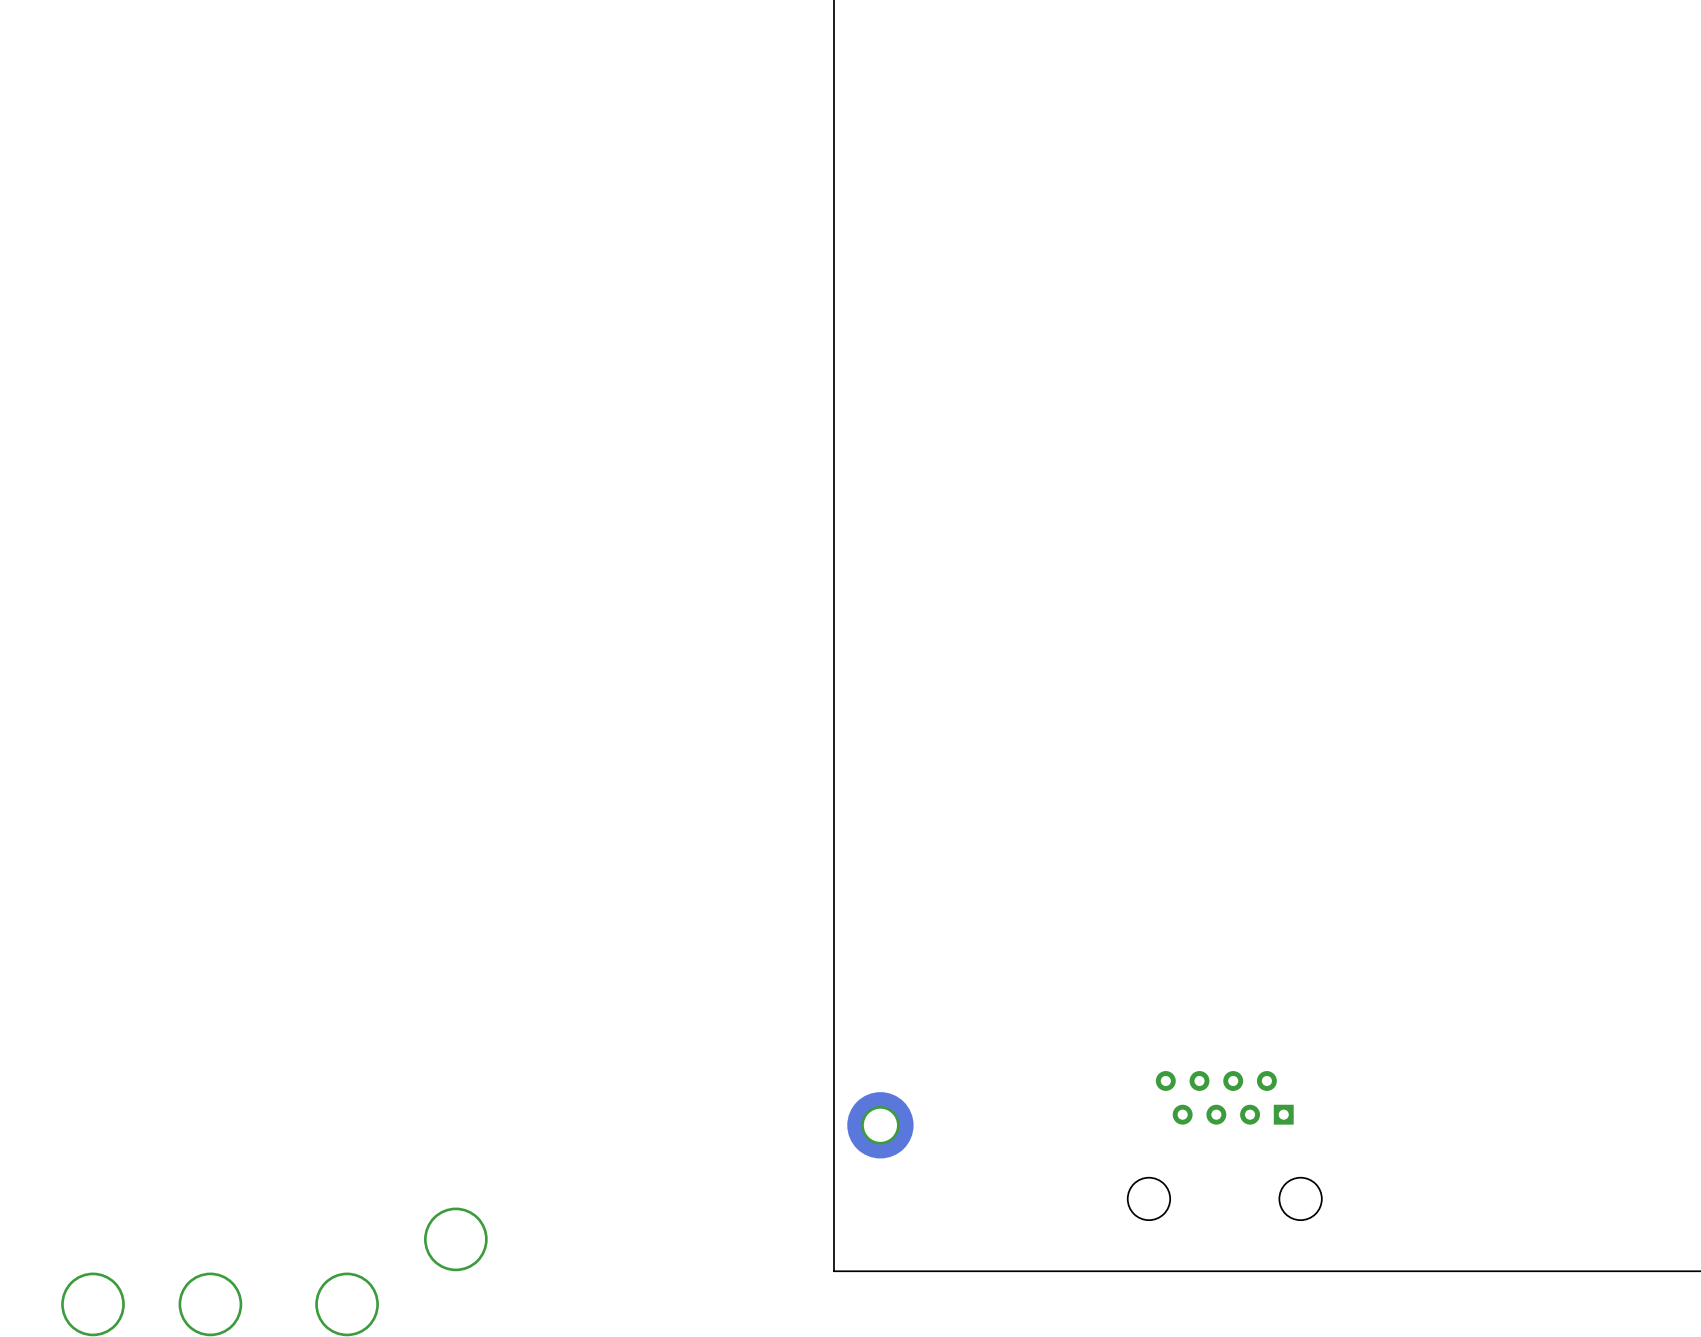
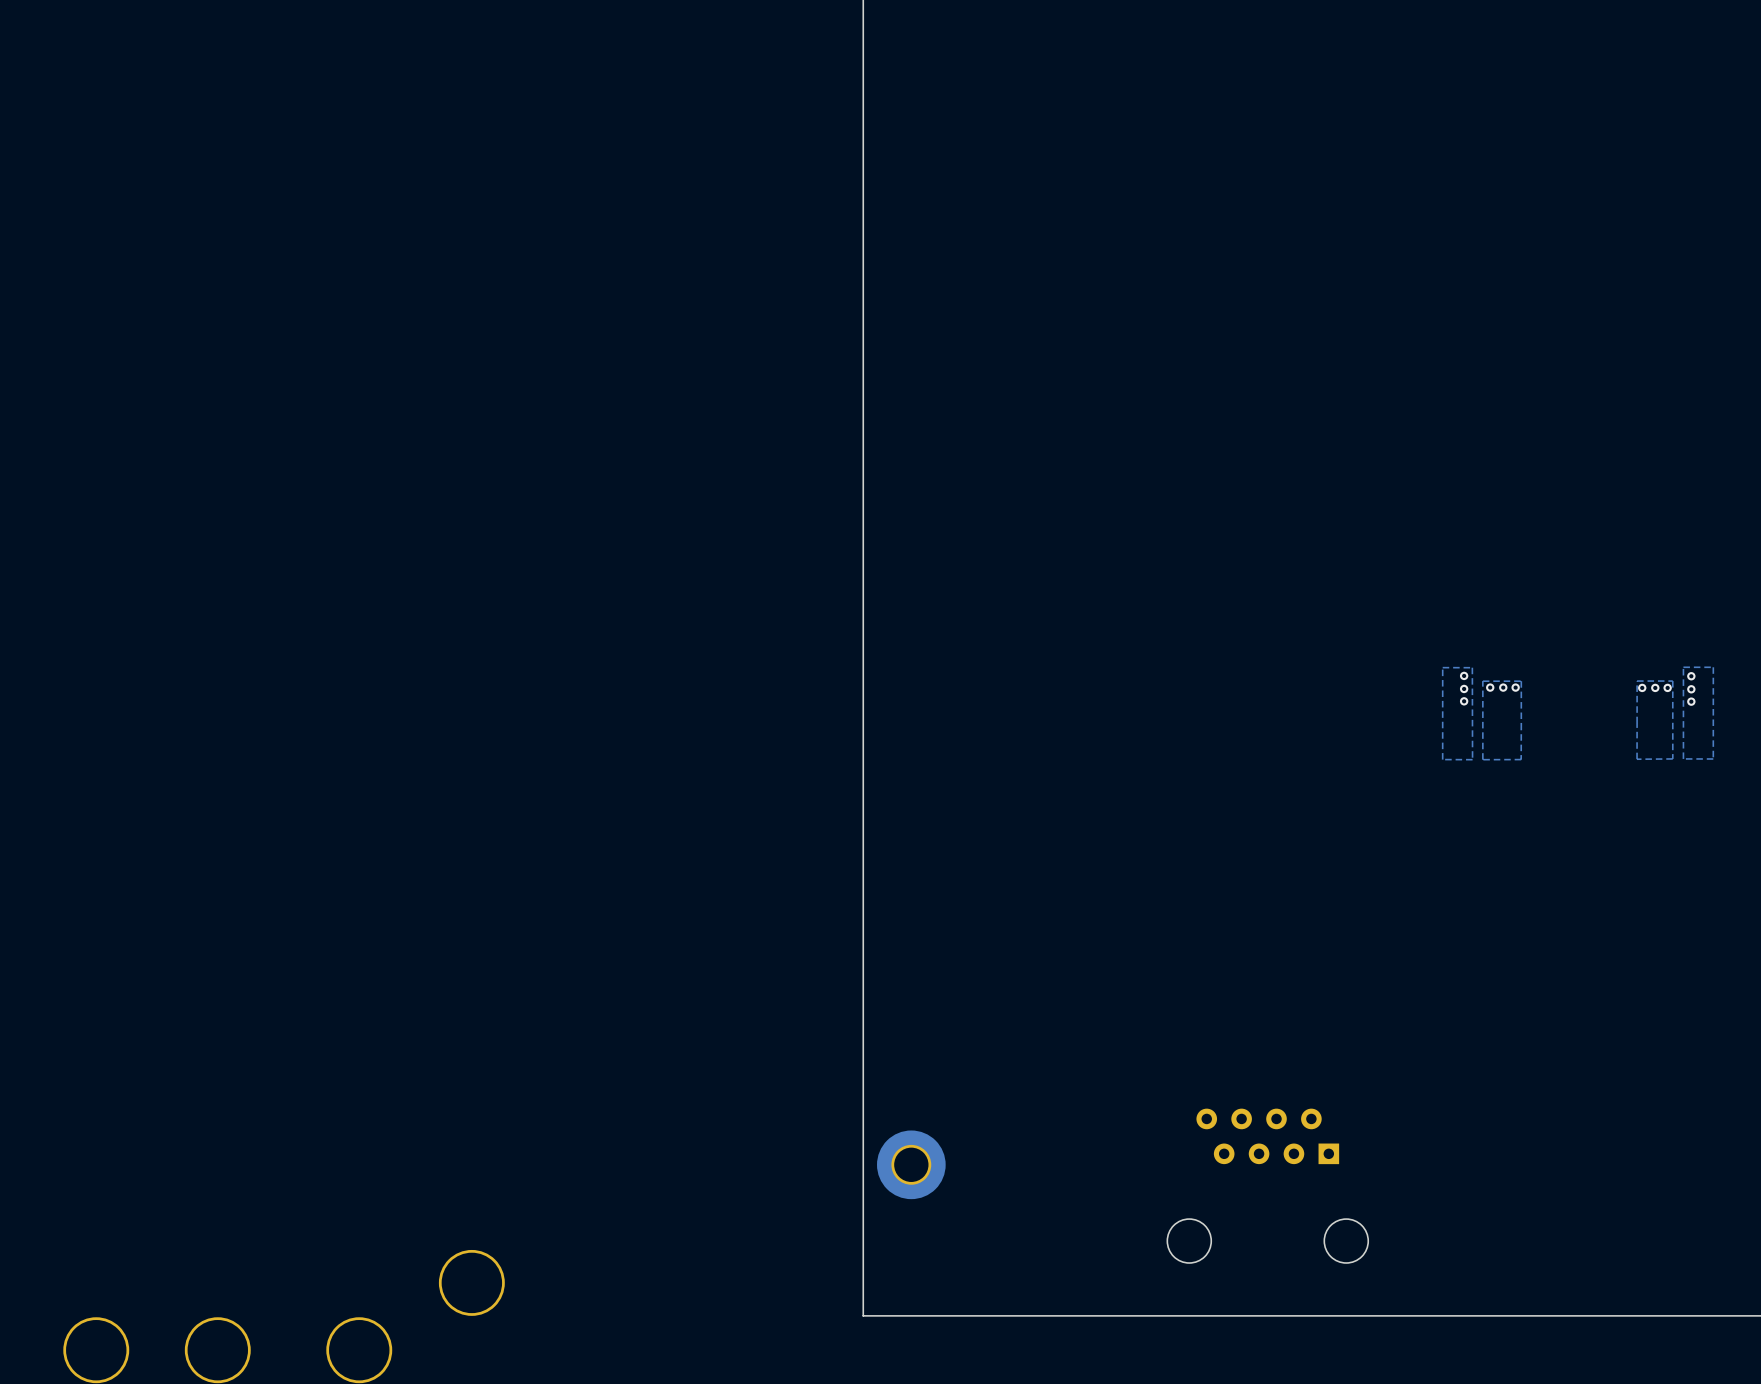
zone outline: none -> (1713, 667) (1683, 667) (1683, 758) (1713, 758) (1713, 667)
zone outline: none -> (1472, 667) (1442, 667) (1442, 759) (1472, 759) (1472, 667)
via: none -> (1464, 675)
via: none -> (1691, 676)
zone outline: none -> (1672, 681) (1637, 681) (1637, 759) (1672, 758) (1672, 681)
zone outline: none -> (1521, 681) (1482, 681) (1482, 759) (1521, 759) (1521, 681)
via: none -> (1490, 687)
via: none -> (1503, 687)
via: none -> (1515, 687)
via: none -> (1642, 687)
via: none -> (1655, 687)
via: none -> (1667, 687)
via: none -> (1464, 688)
via: none -> (1691, 689)
via: none -> (1464, 701)
via: none -> (1691, 701)

